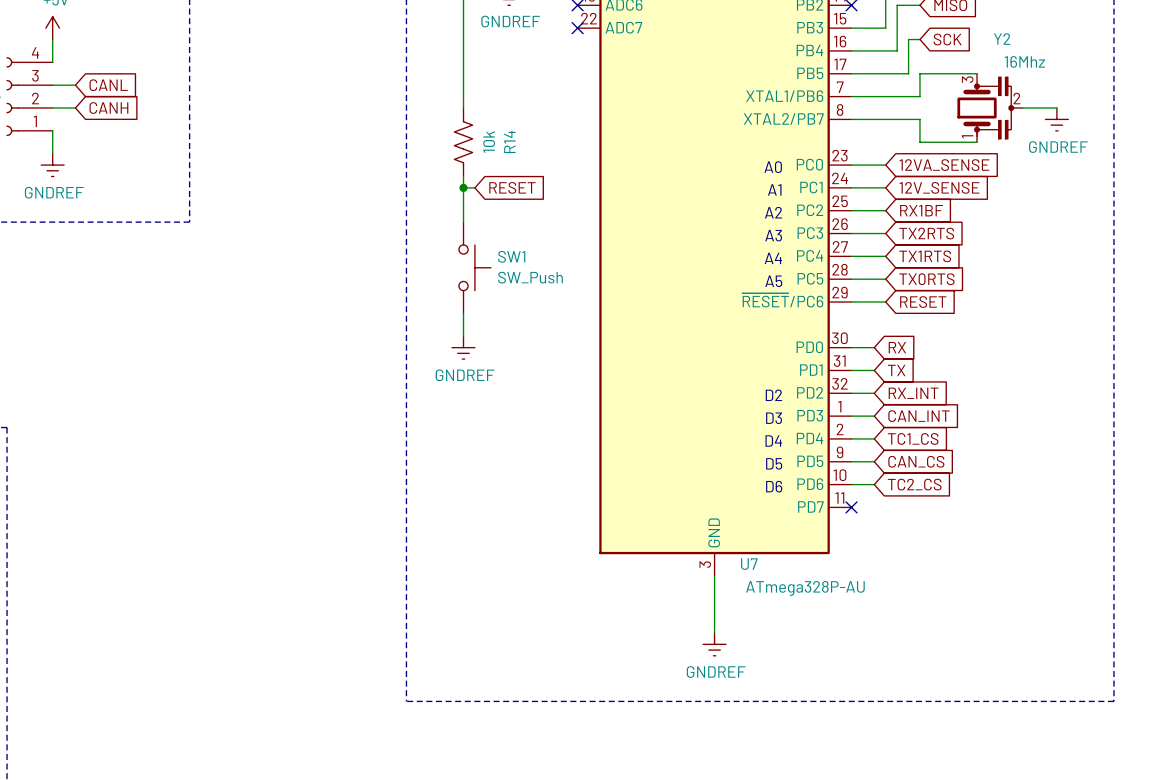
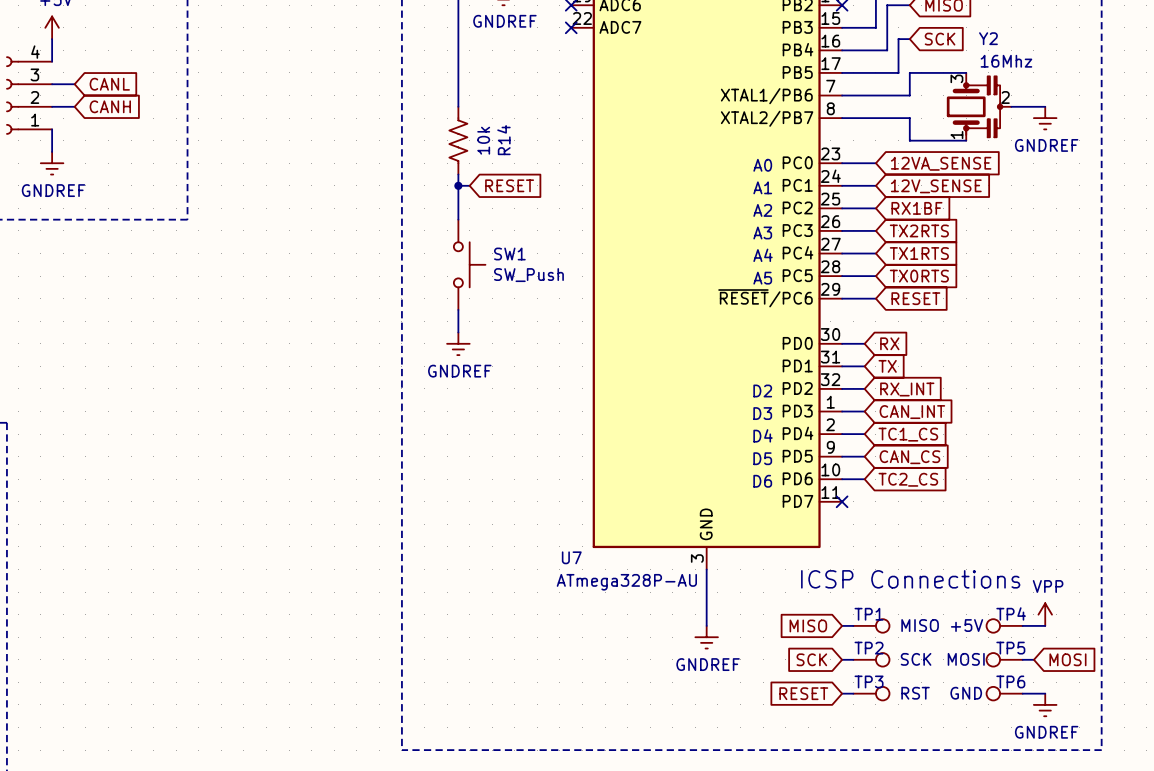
U7 name position: U7 (749, 564) -> U7 (571, 557)
text: none -> ICSP Connections (910, 579)
U7 value position: ATmega328P-AU (805, 588) -> ATmega328P-AU (626, 582)
power symbol: none -> VPP (1045, 614)
global label: none -> MISO (808, 625)
wire: none -> (842, 625) (853, 625)
TP1: none -> MISO (871, 625)
TP4: none -> +5V (1004, 625)
wire: none -> (1022, 625) (1045, 625)
global label: none -> SCK (811, 659)
wire: none -> (842, 659) (853, 659)
TP2: none -> SCK (871, 659)
TP5: none -> MOSI (1004, 659)
wire: none -> (1022, 659) (1033, 659)
global label: none -> MOSI (1067, 659)
line: (406, 701) (1113, 701) -> (401, 693) (401, 750) (1101, 750) (1101, 693)
global label: none -> RESET (803, 693)
TP3: none -> RST (871, 693)
TP6: none -> GND (1004, 693)
power symbol: none -> GNDREF (1045, 704)

